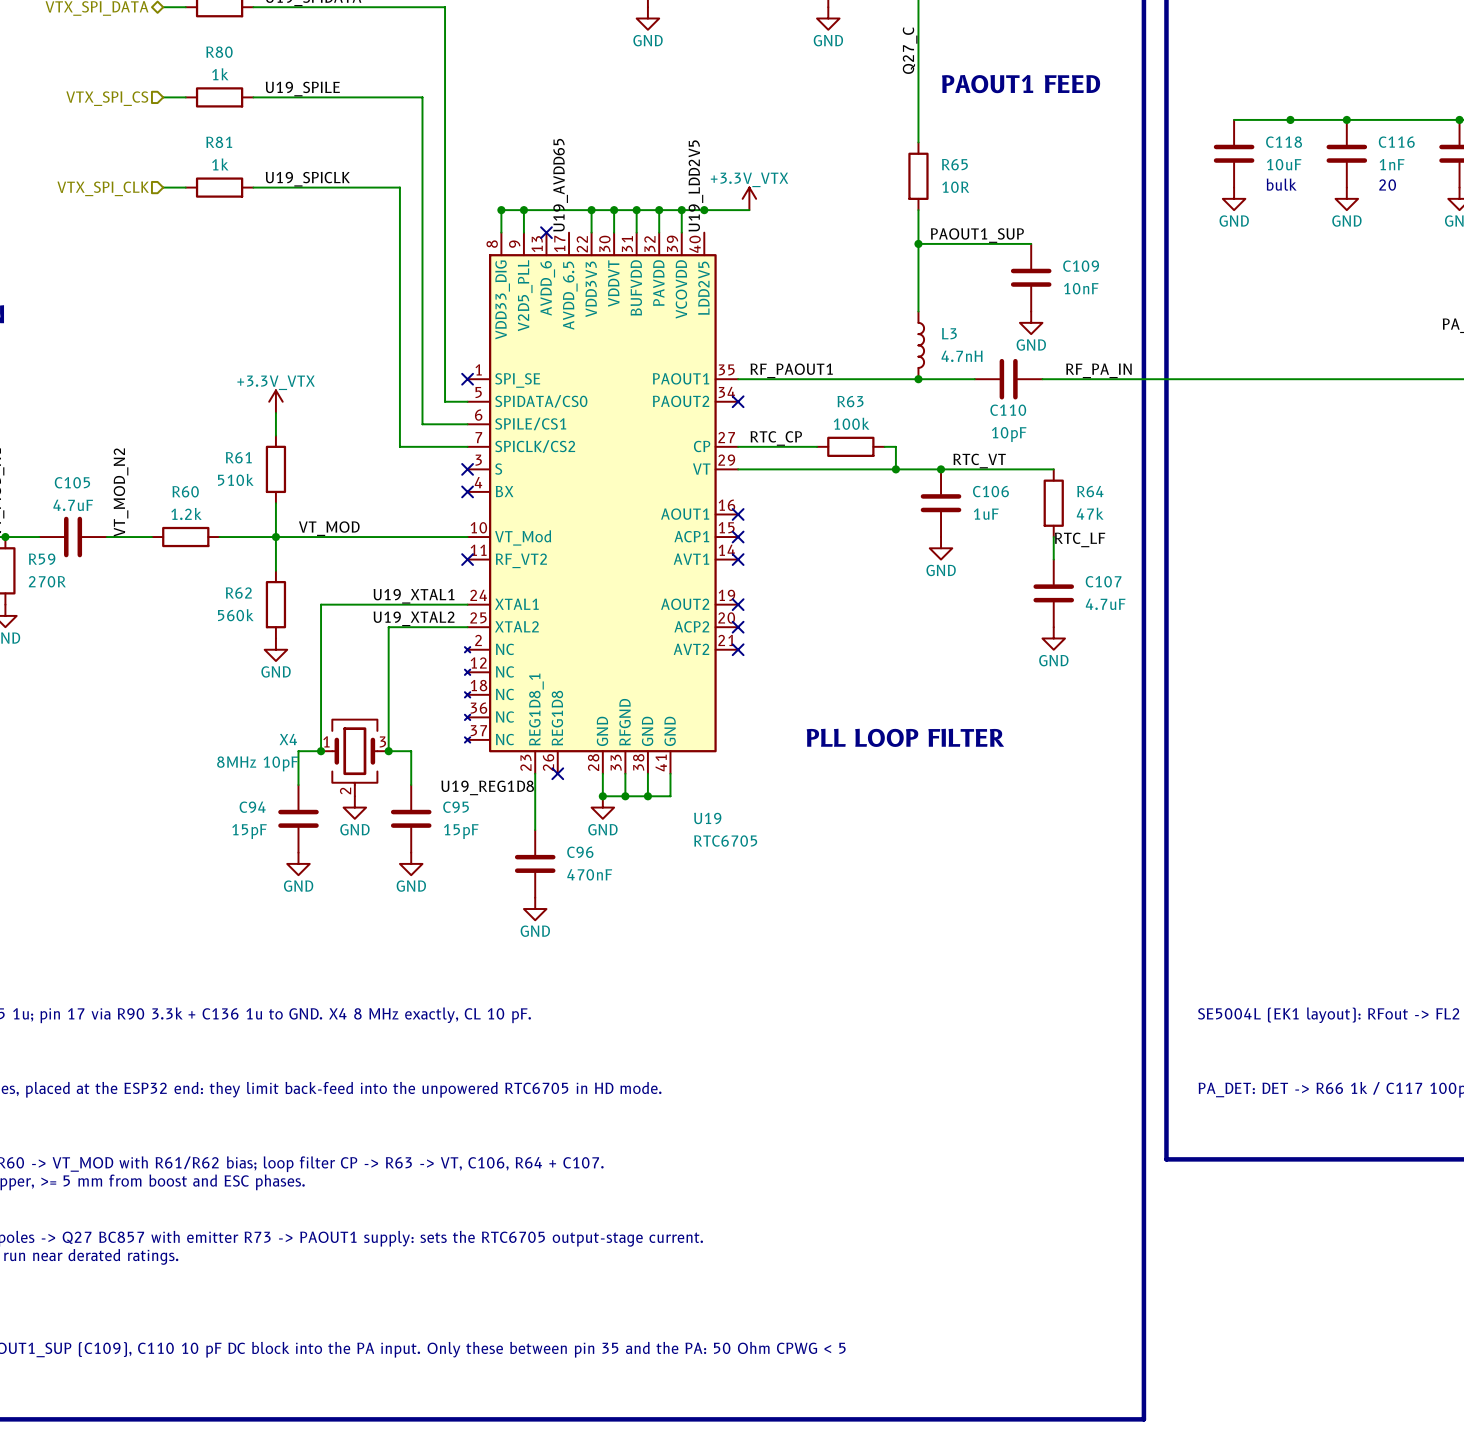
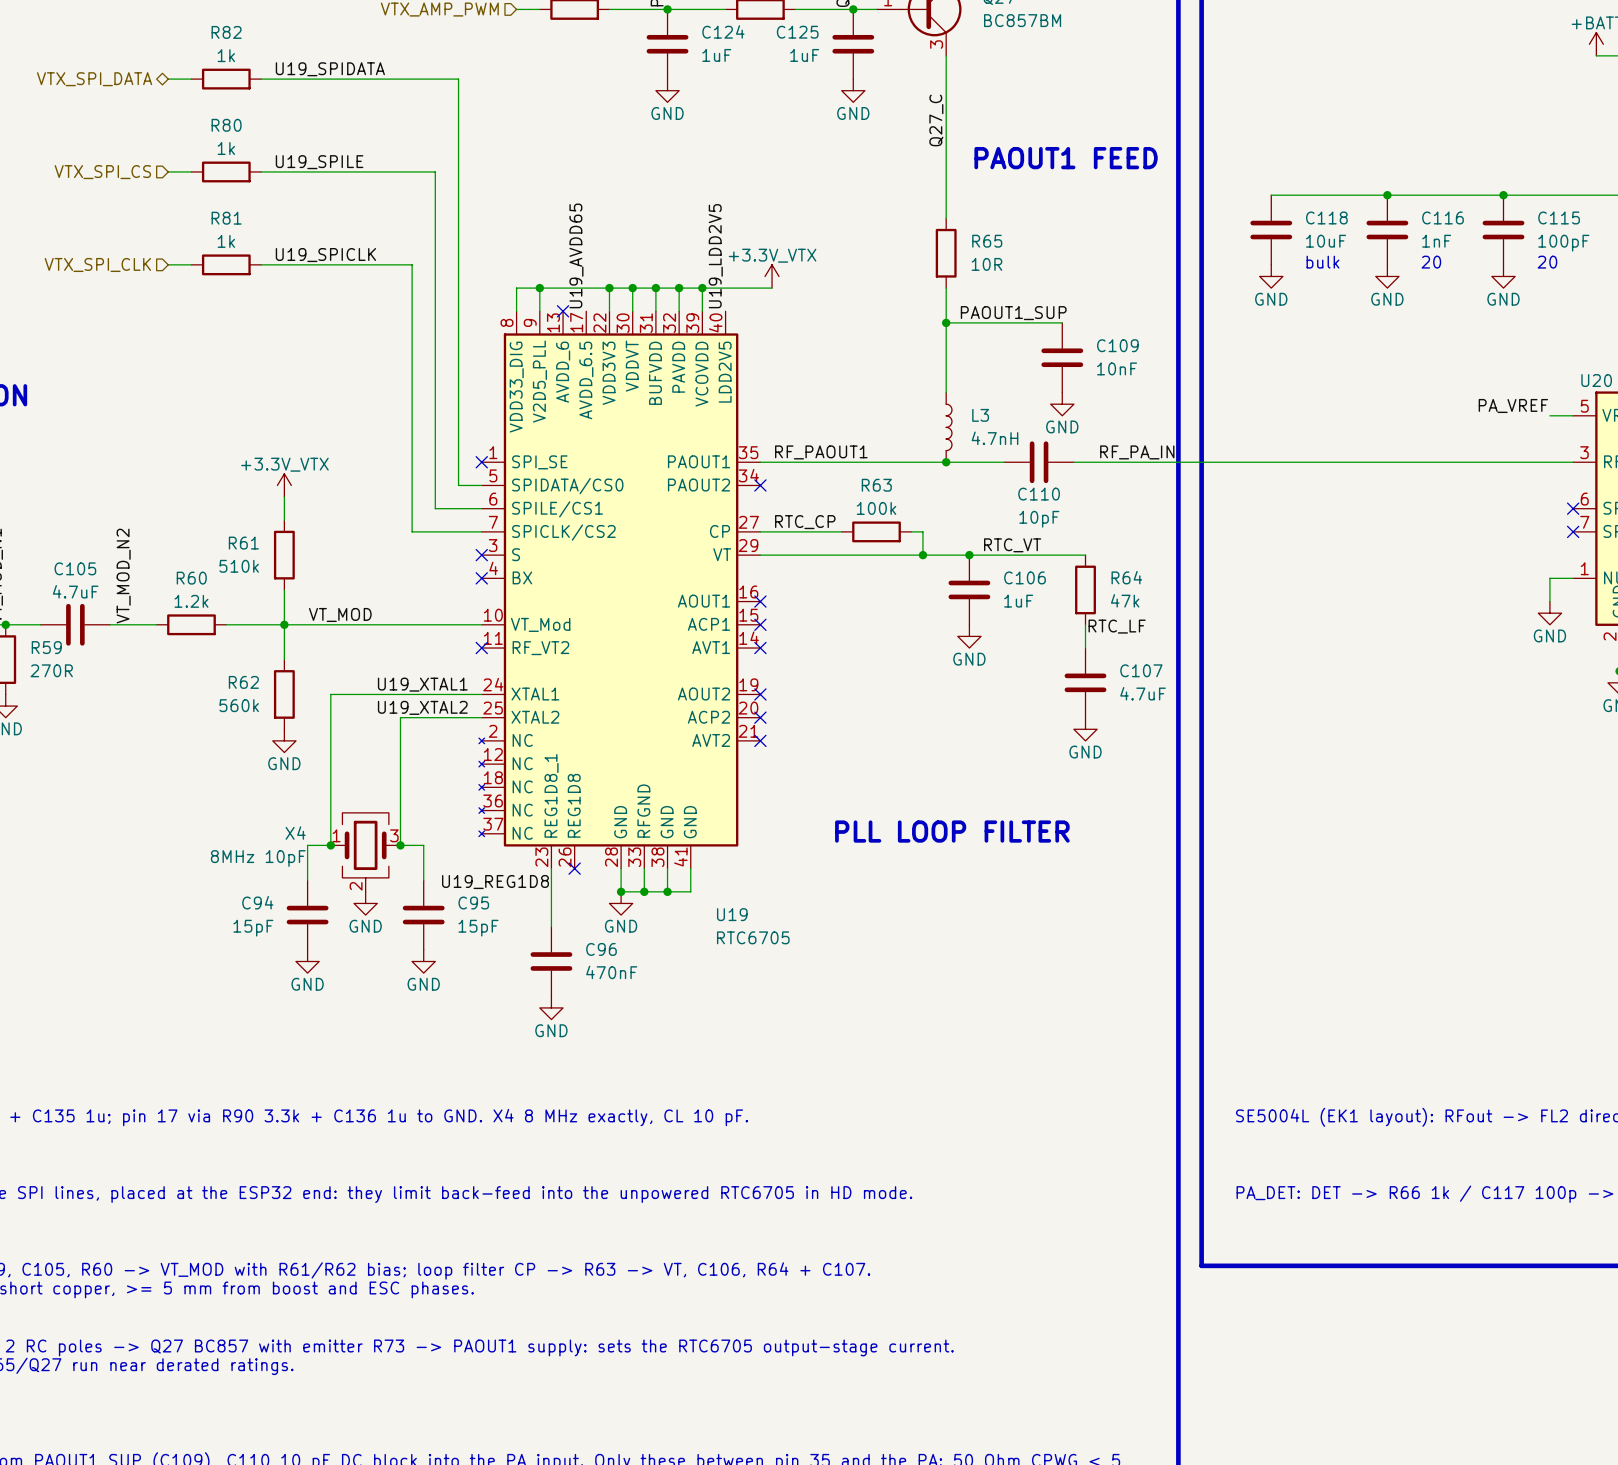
junction: (1290, 119) -> none
junction: (501, 210) -> none
junction: (704, 210) -> none

